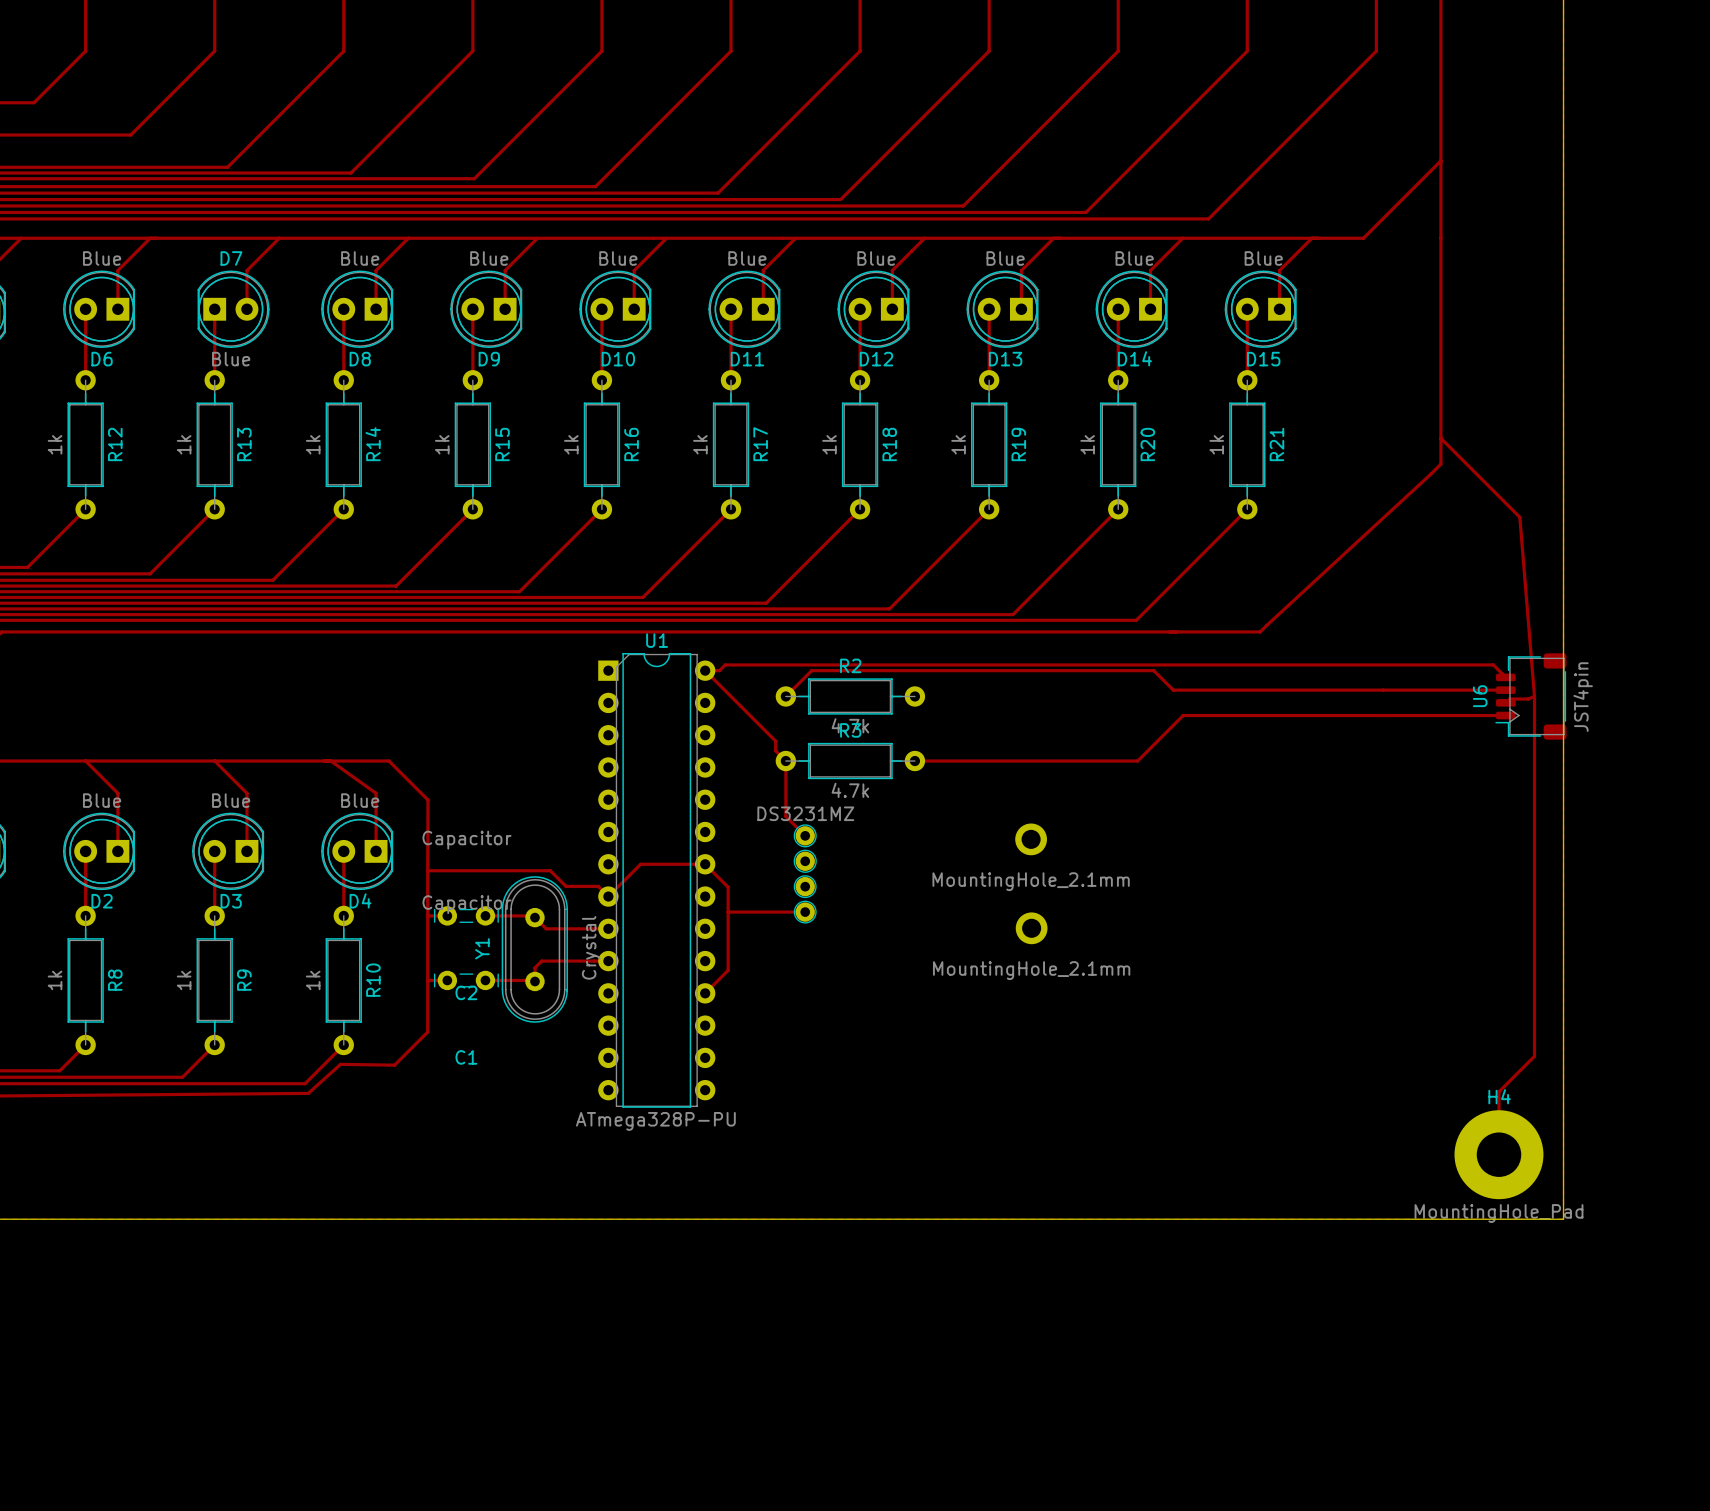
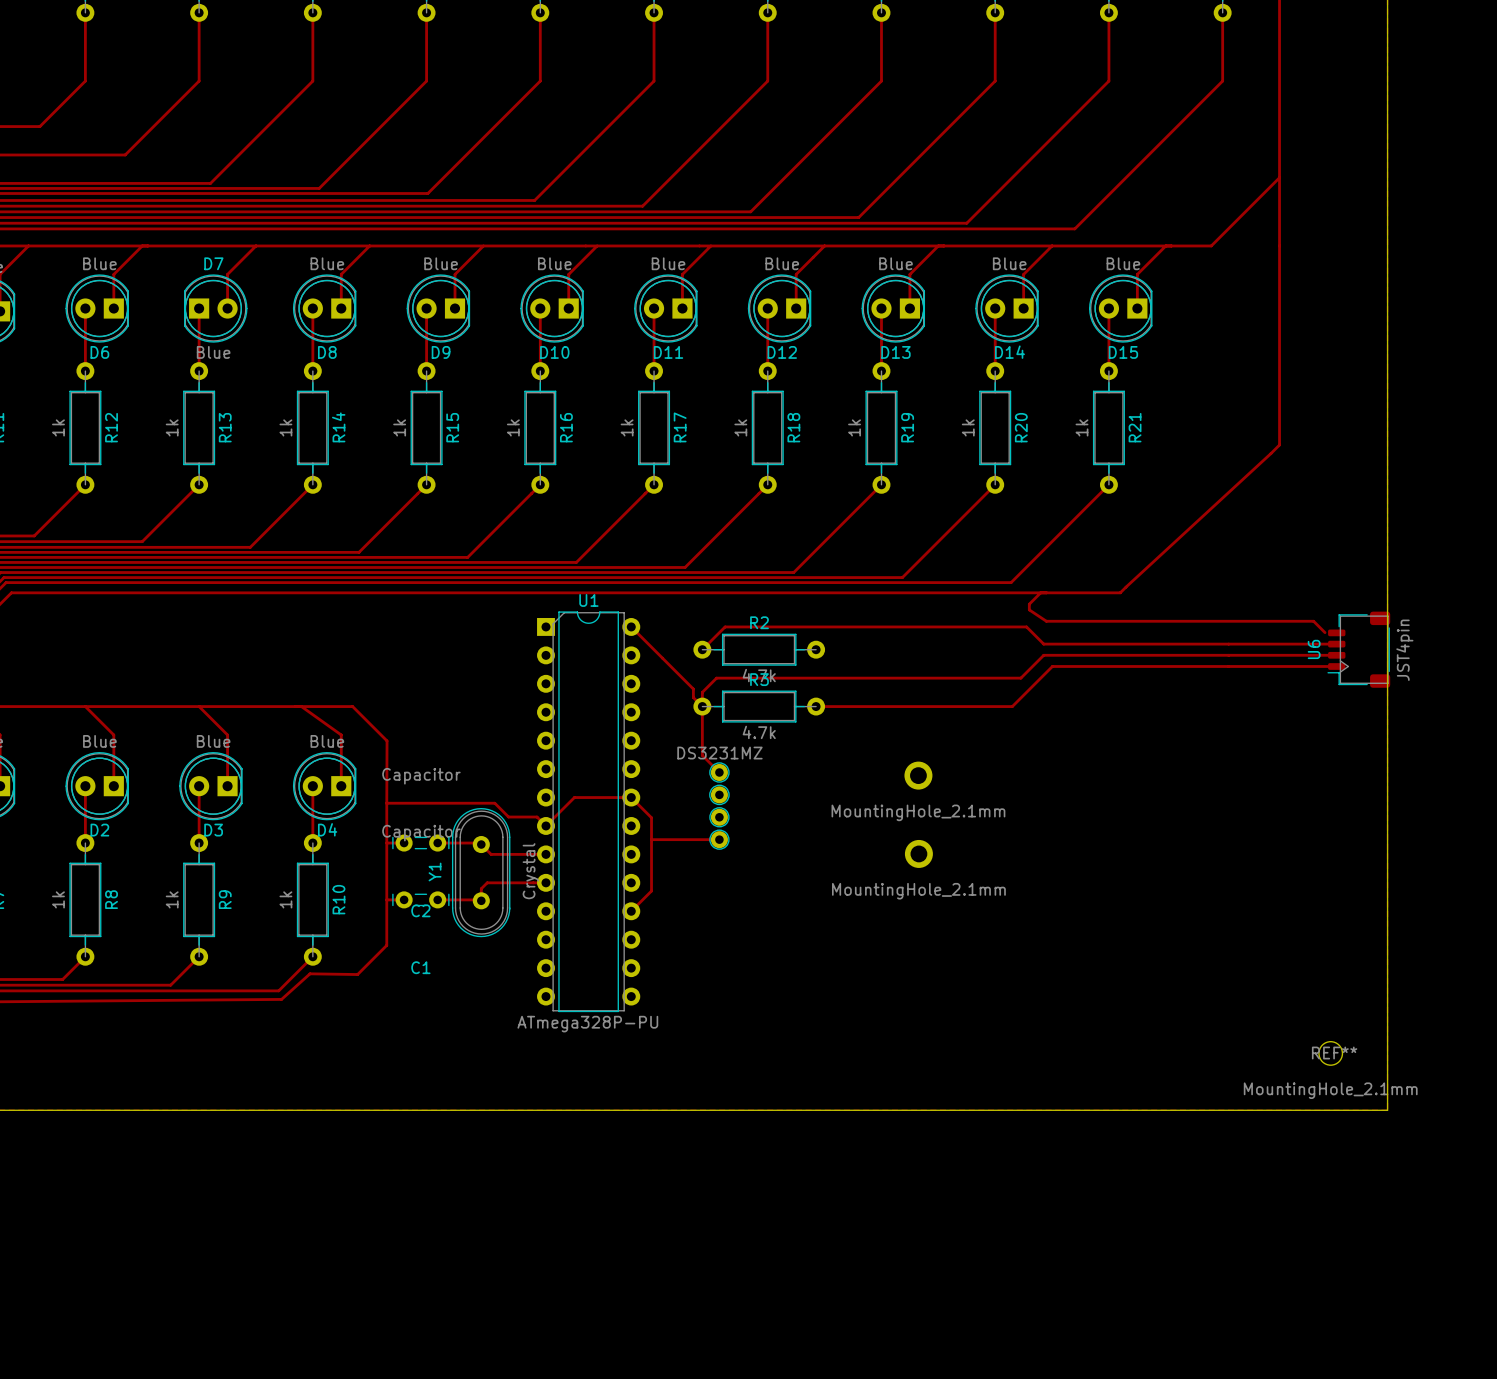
track: (1440, 438) (1519, 517) (1534, 696) -> none
track: none -> (1040, 592) (1029, 604) (1029, 609) (1046, 621) (1313, 621) (1325, 632)
track: (705, 670) (719, 670) (725, 664) (1493, 664) (1505, 677) -> none
track: (1534, 696) (1528, 699) (1509, 699) (1505, 702) -> (702, 706) (702, 692) (716, 678) (1020, 678) (1043, 655) (1336, 655)
track: (1534, 696) (1534, 1056) (1498, 1091) (1498, 1154) -> none
H4: MountingHole_Pad (1498, 1154) -> none
REF**: none -> MountingHole_2.1mm (1330, 1053)

